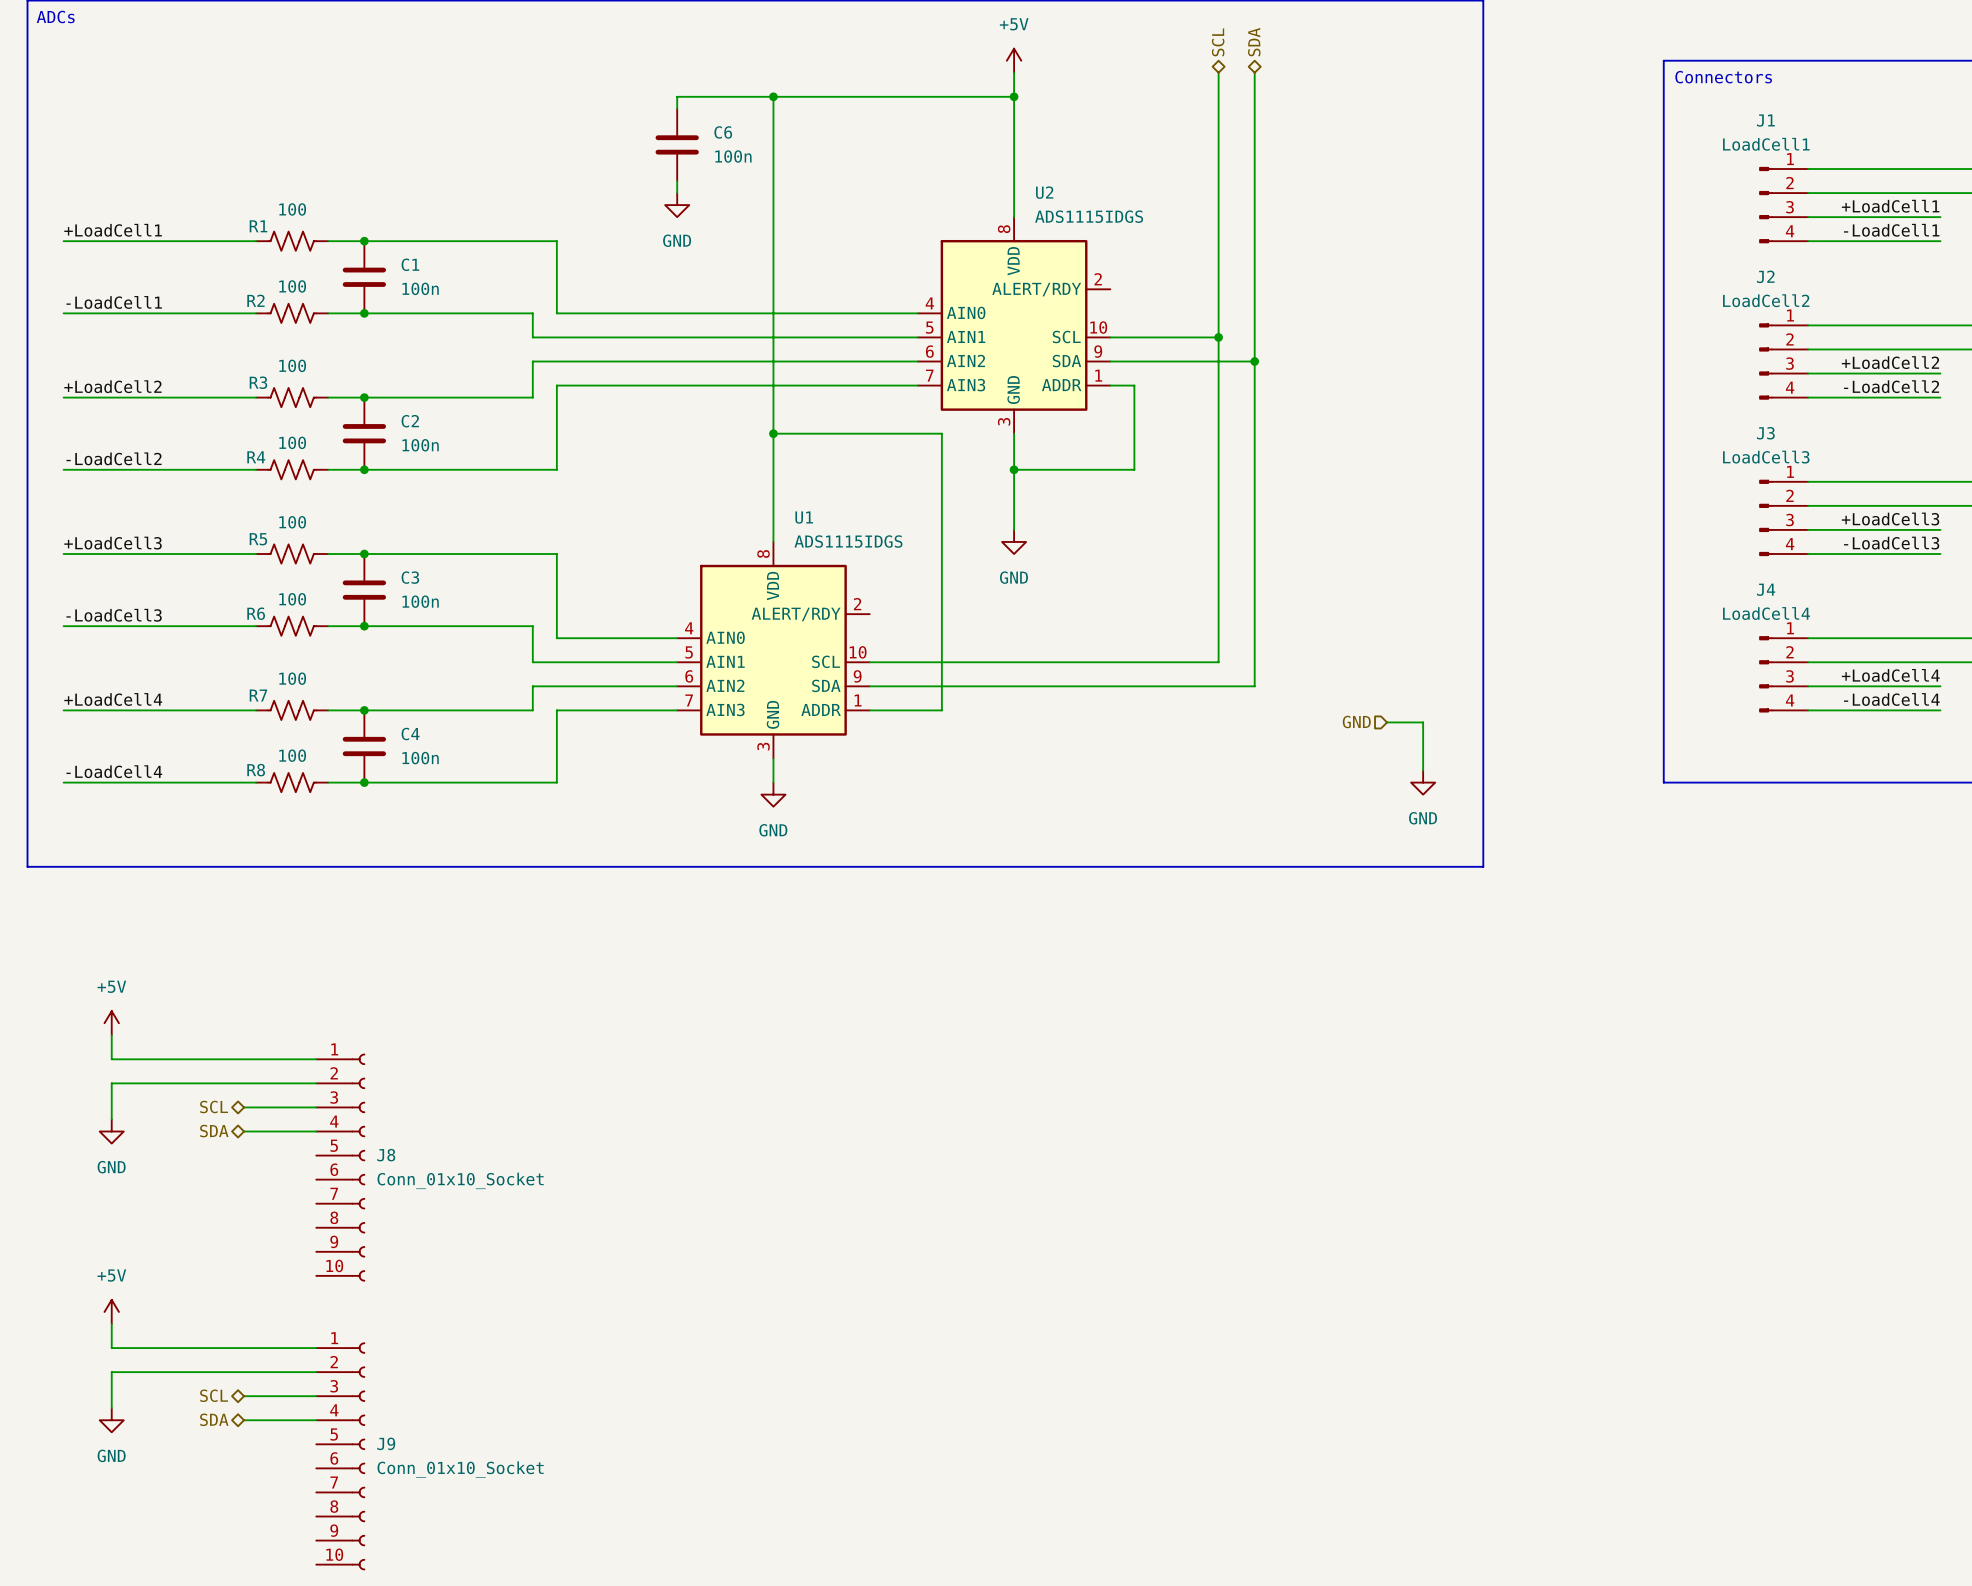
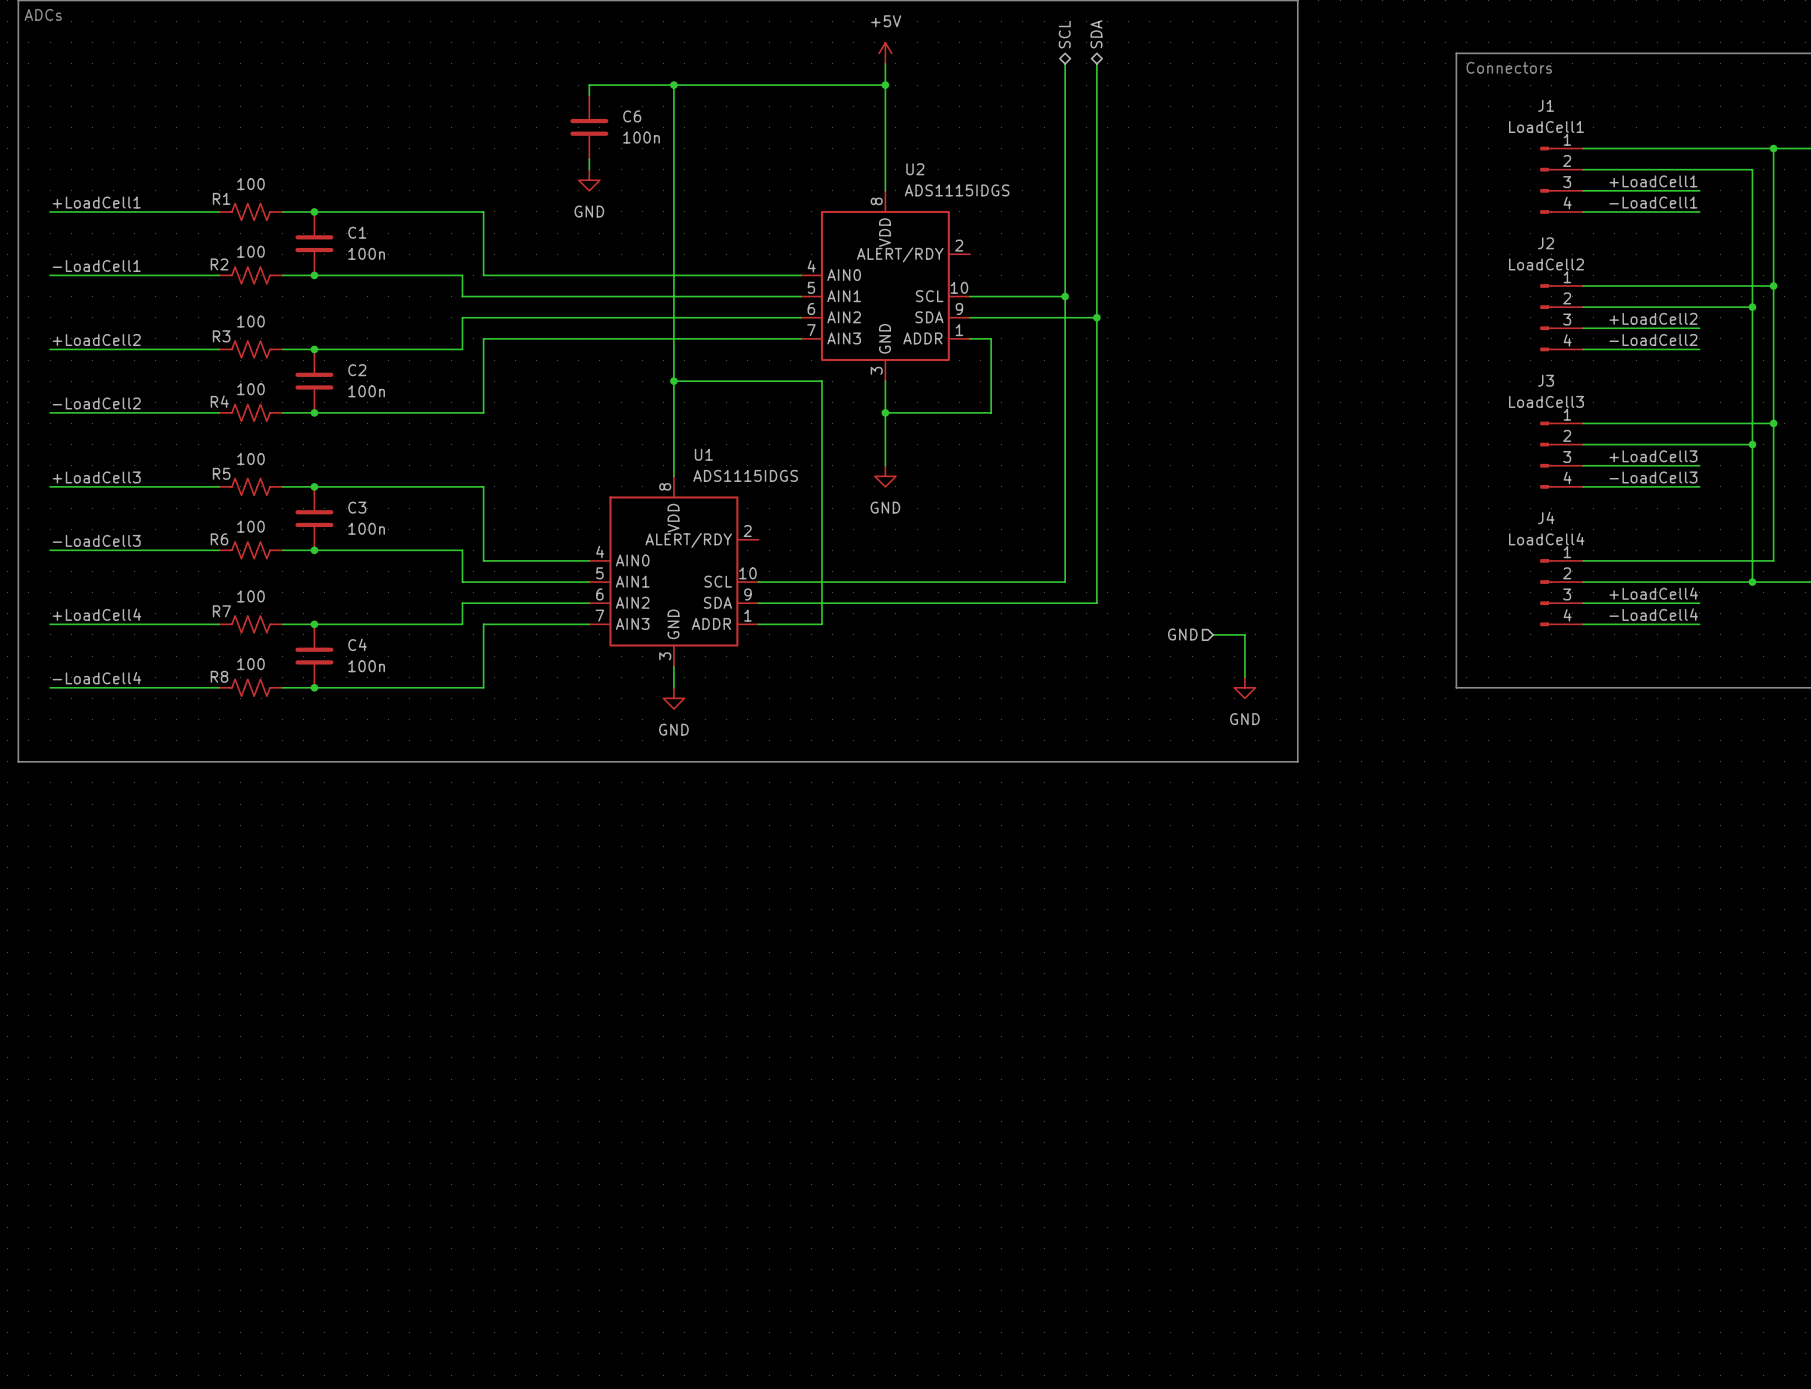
power symbol: +5V (111, 1023) -> none
wire: (111, 1035) (111, 1059) (316, 1059) -> none
wire: (316, 1083) (111, 1083) (111, 1119) -> none
hierarchical label: SCL (214, 1107) -> none
wire: (244, 1107) (316, 1107) -> none
power symbol: GND (111, 1131) -> none
hierarchical label: SDA (214, 1131) -> none
wire: (244, 1131) (316, 1131) -> none
J8: Conn_01x10_Socket (340, 1167) -> none
power symbol: +5V (111, 1311) -> none
wire: (111, 1324) (111, 1348) (316, 1348) -> none
wire: (316, 1372) (111, 1372) (111, 1408) -> none
hierarchical label: SCL (214, 1395) -> none
wire: (244, 1396) (316, 1396) -> none
hierarchical label: SDA (214, 1419) -> none
power symbol: GND (111, 1420) -> none
wire: (244, 1420) (316, 1420) -> none
J9: Conn_01x10_Socket (340, 1456) -> none

